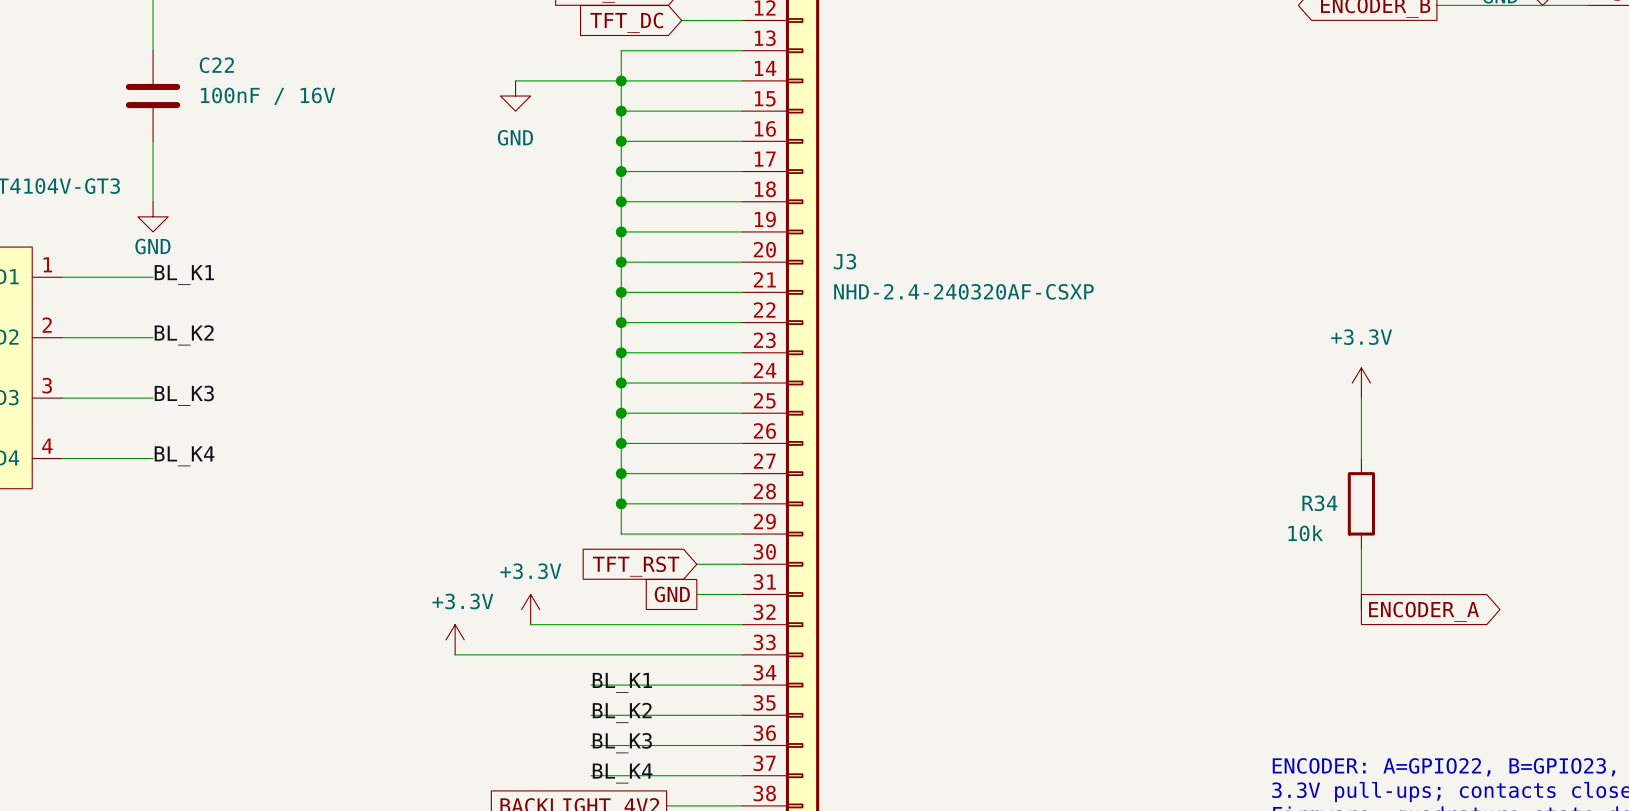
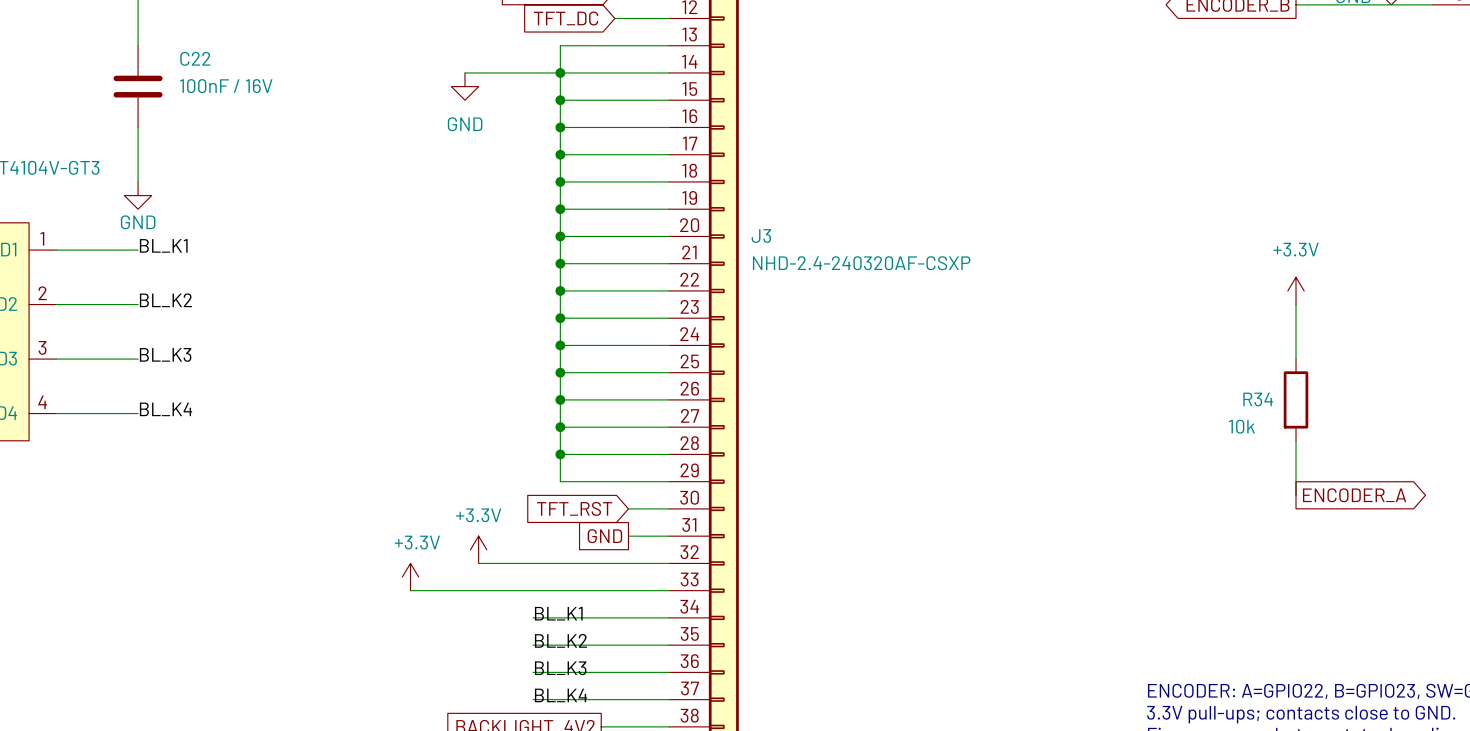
power symbol position: +3.3V (1361, 383) -> +3.3V (1296, 290)
wire: (1361, 398) (1361, 458) -> (1296, 304) (1296, 359)
R34 position: (1361, 503) -> (1296, 399)
wire: (1361, 549) (1361, 609) -> (1296, 440) (1296, 495)
global label position: ENCODER_A (1424, 611) -> ENCODER_A (1354, 495)

